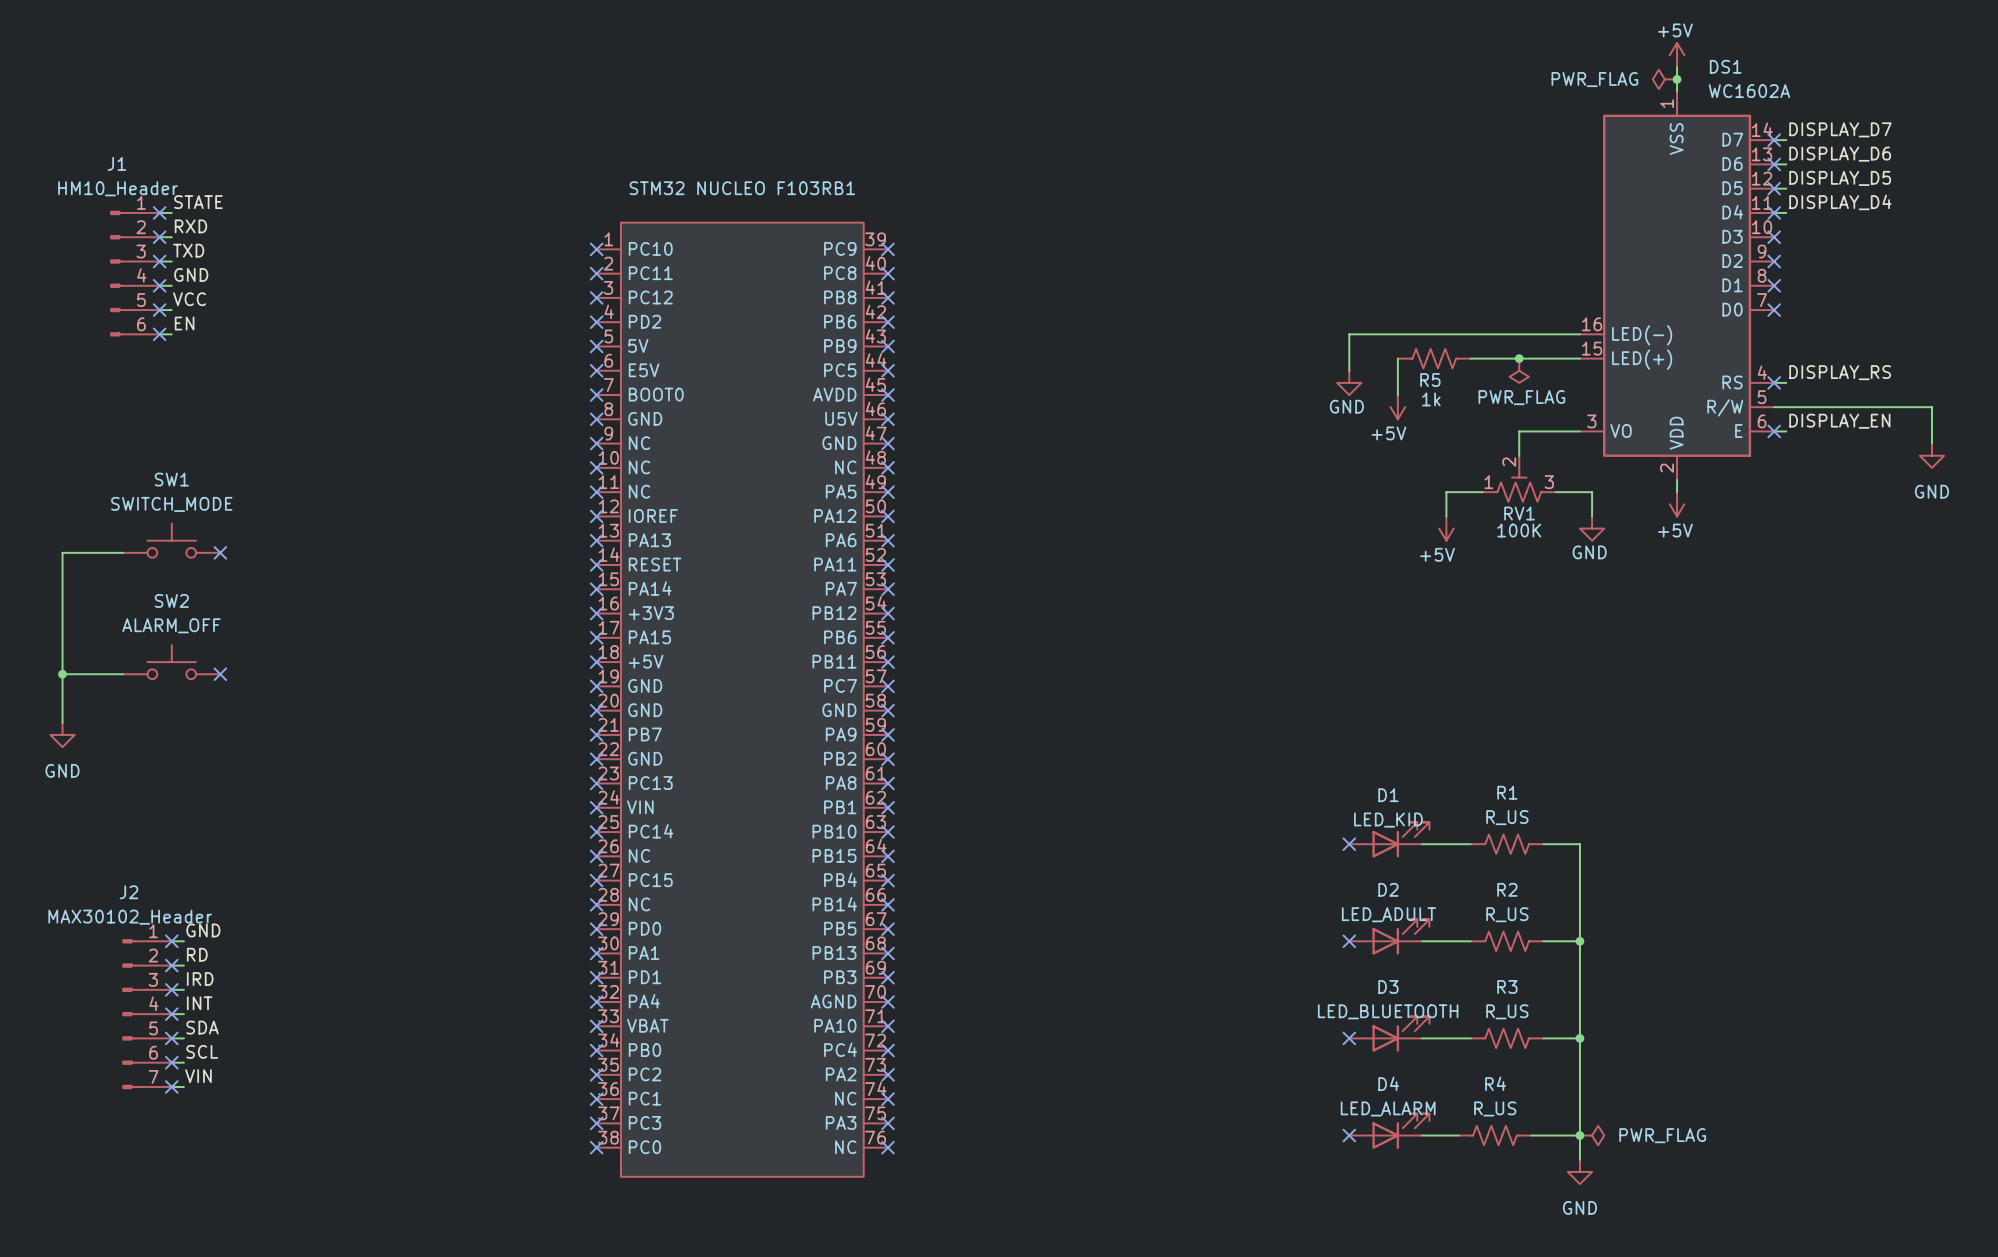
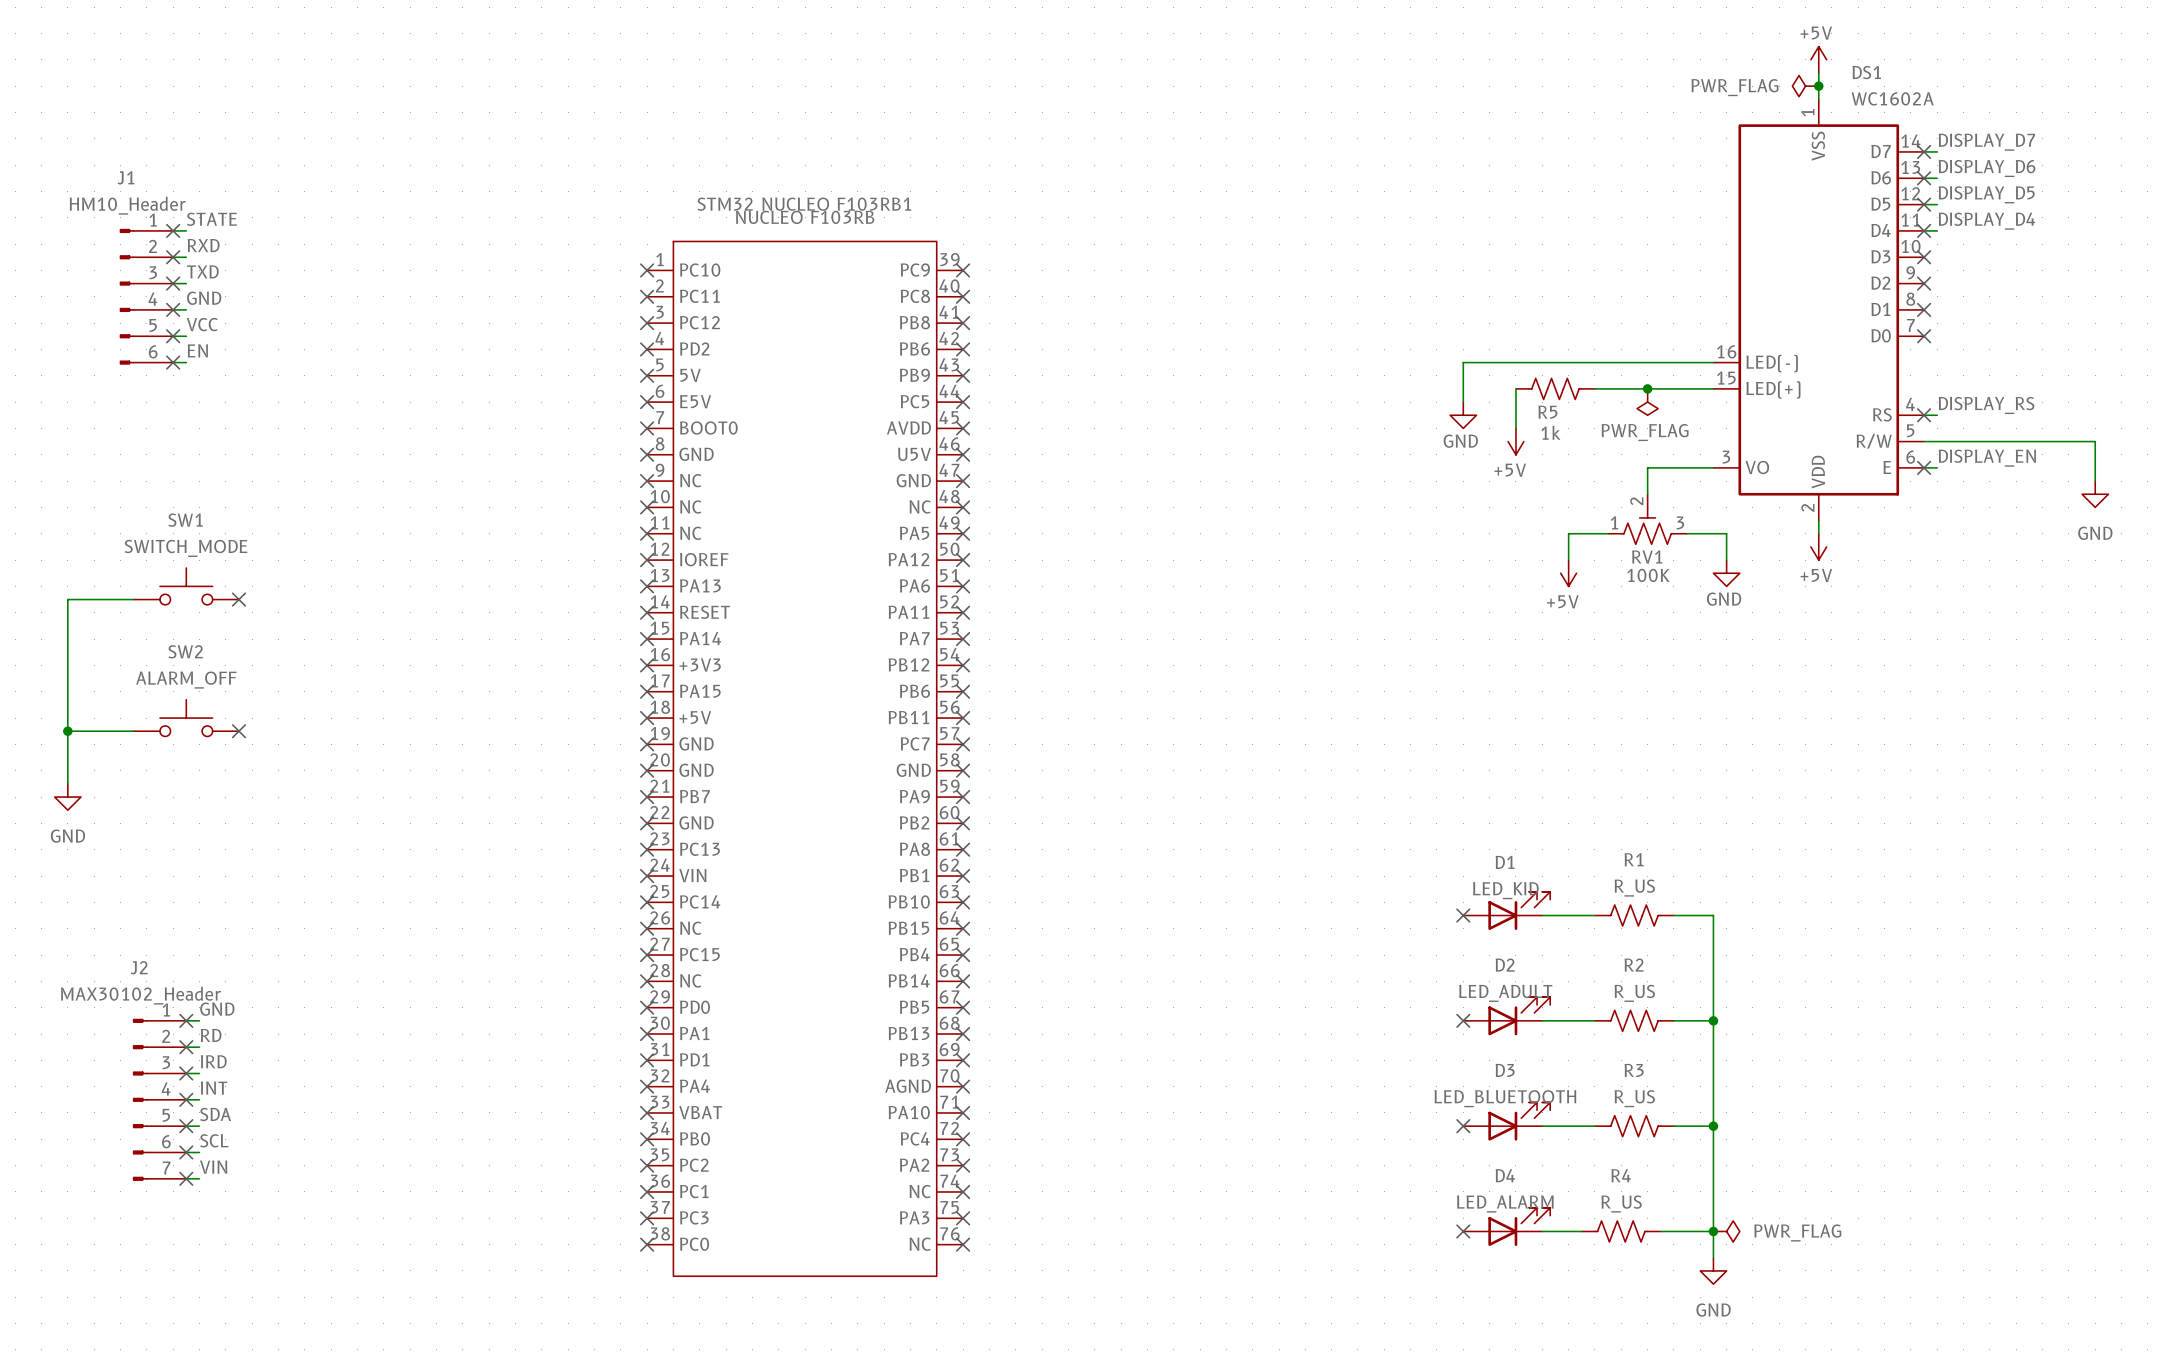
STM32 NUCLEO F103RB1 value: none -> NUCLEO F103RB (805, 217)

